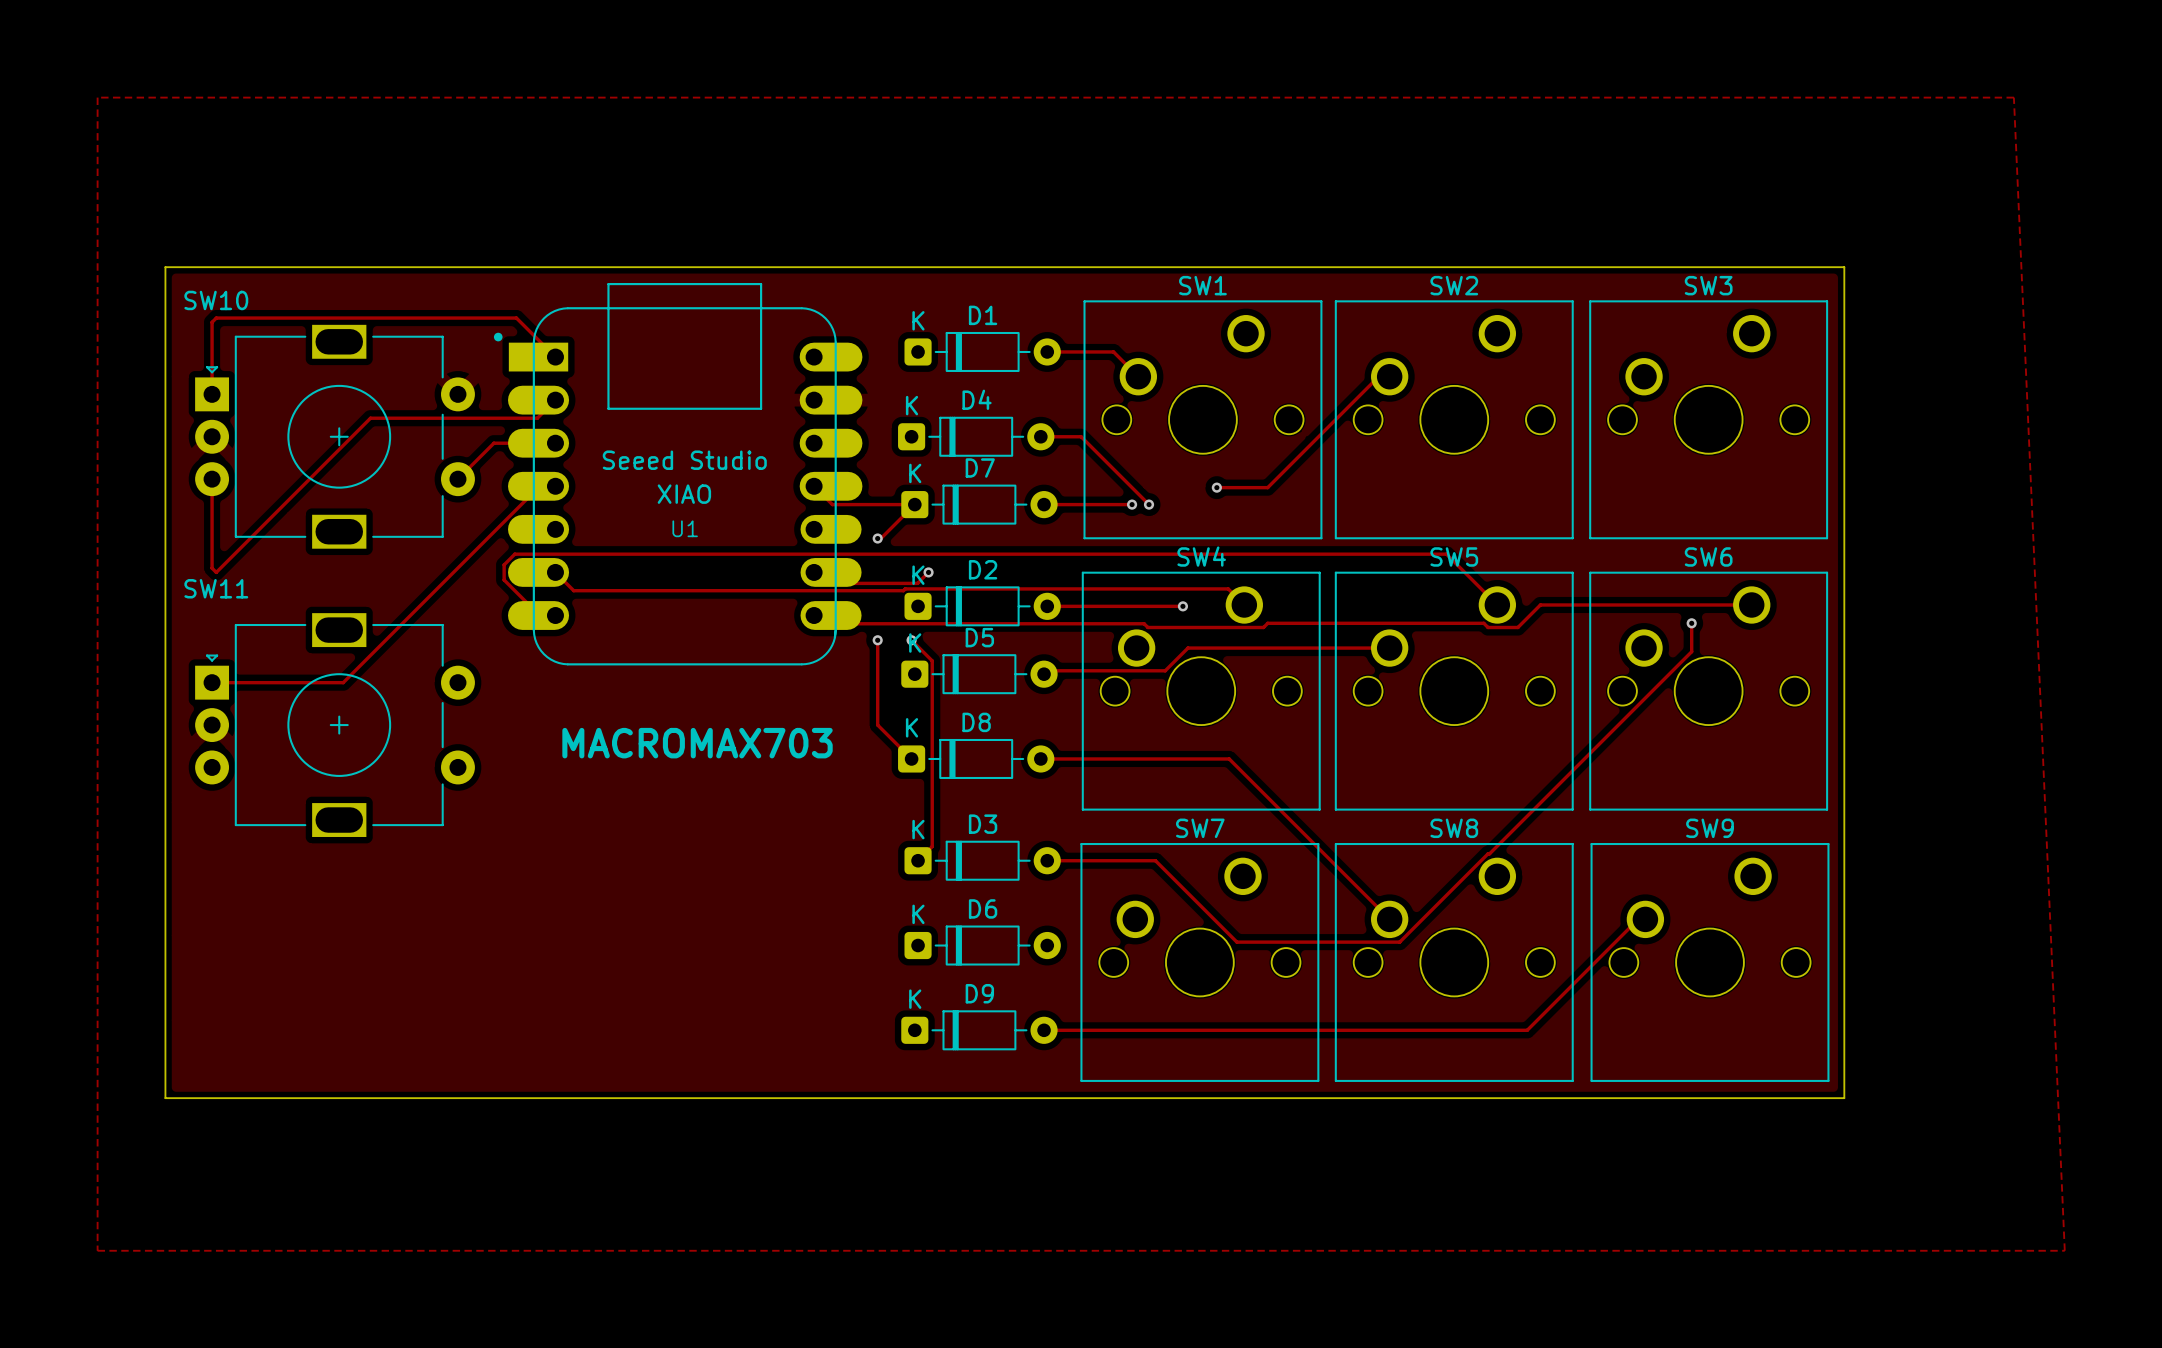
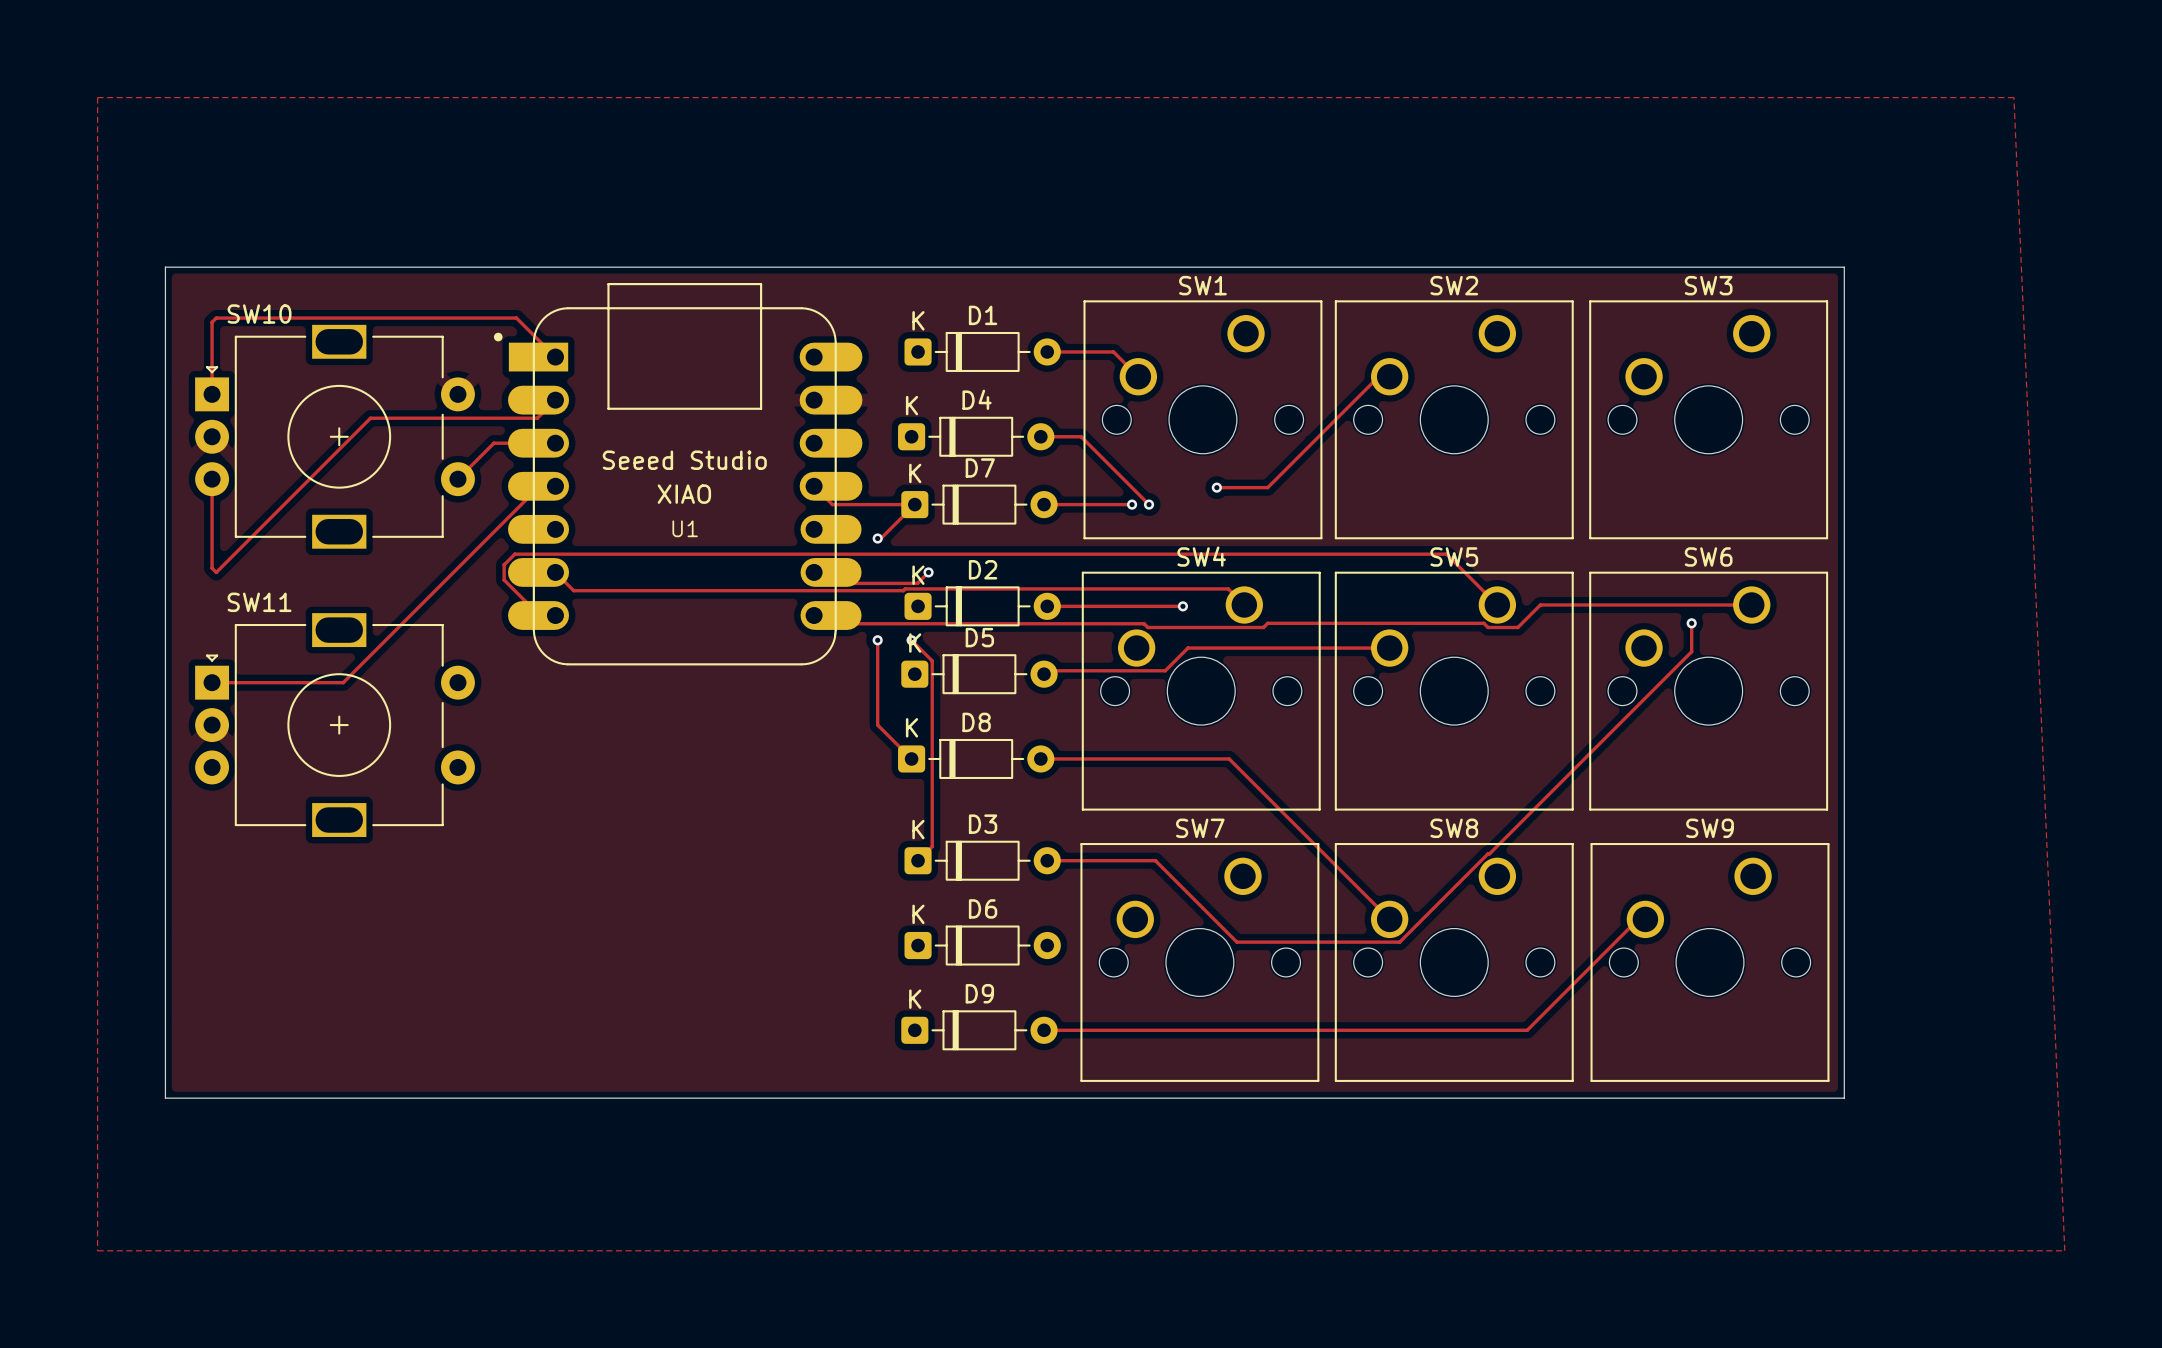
SW10 name position: SW10 (216, 300) -> SW10 (259, 314)
SW11 name position: SW11 (216, 588) -> SW11 (259, 602)
text: MACROMAX703 (697, 743) -> none

